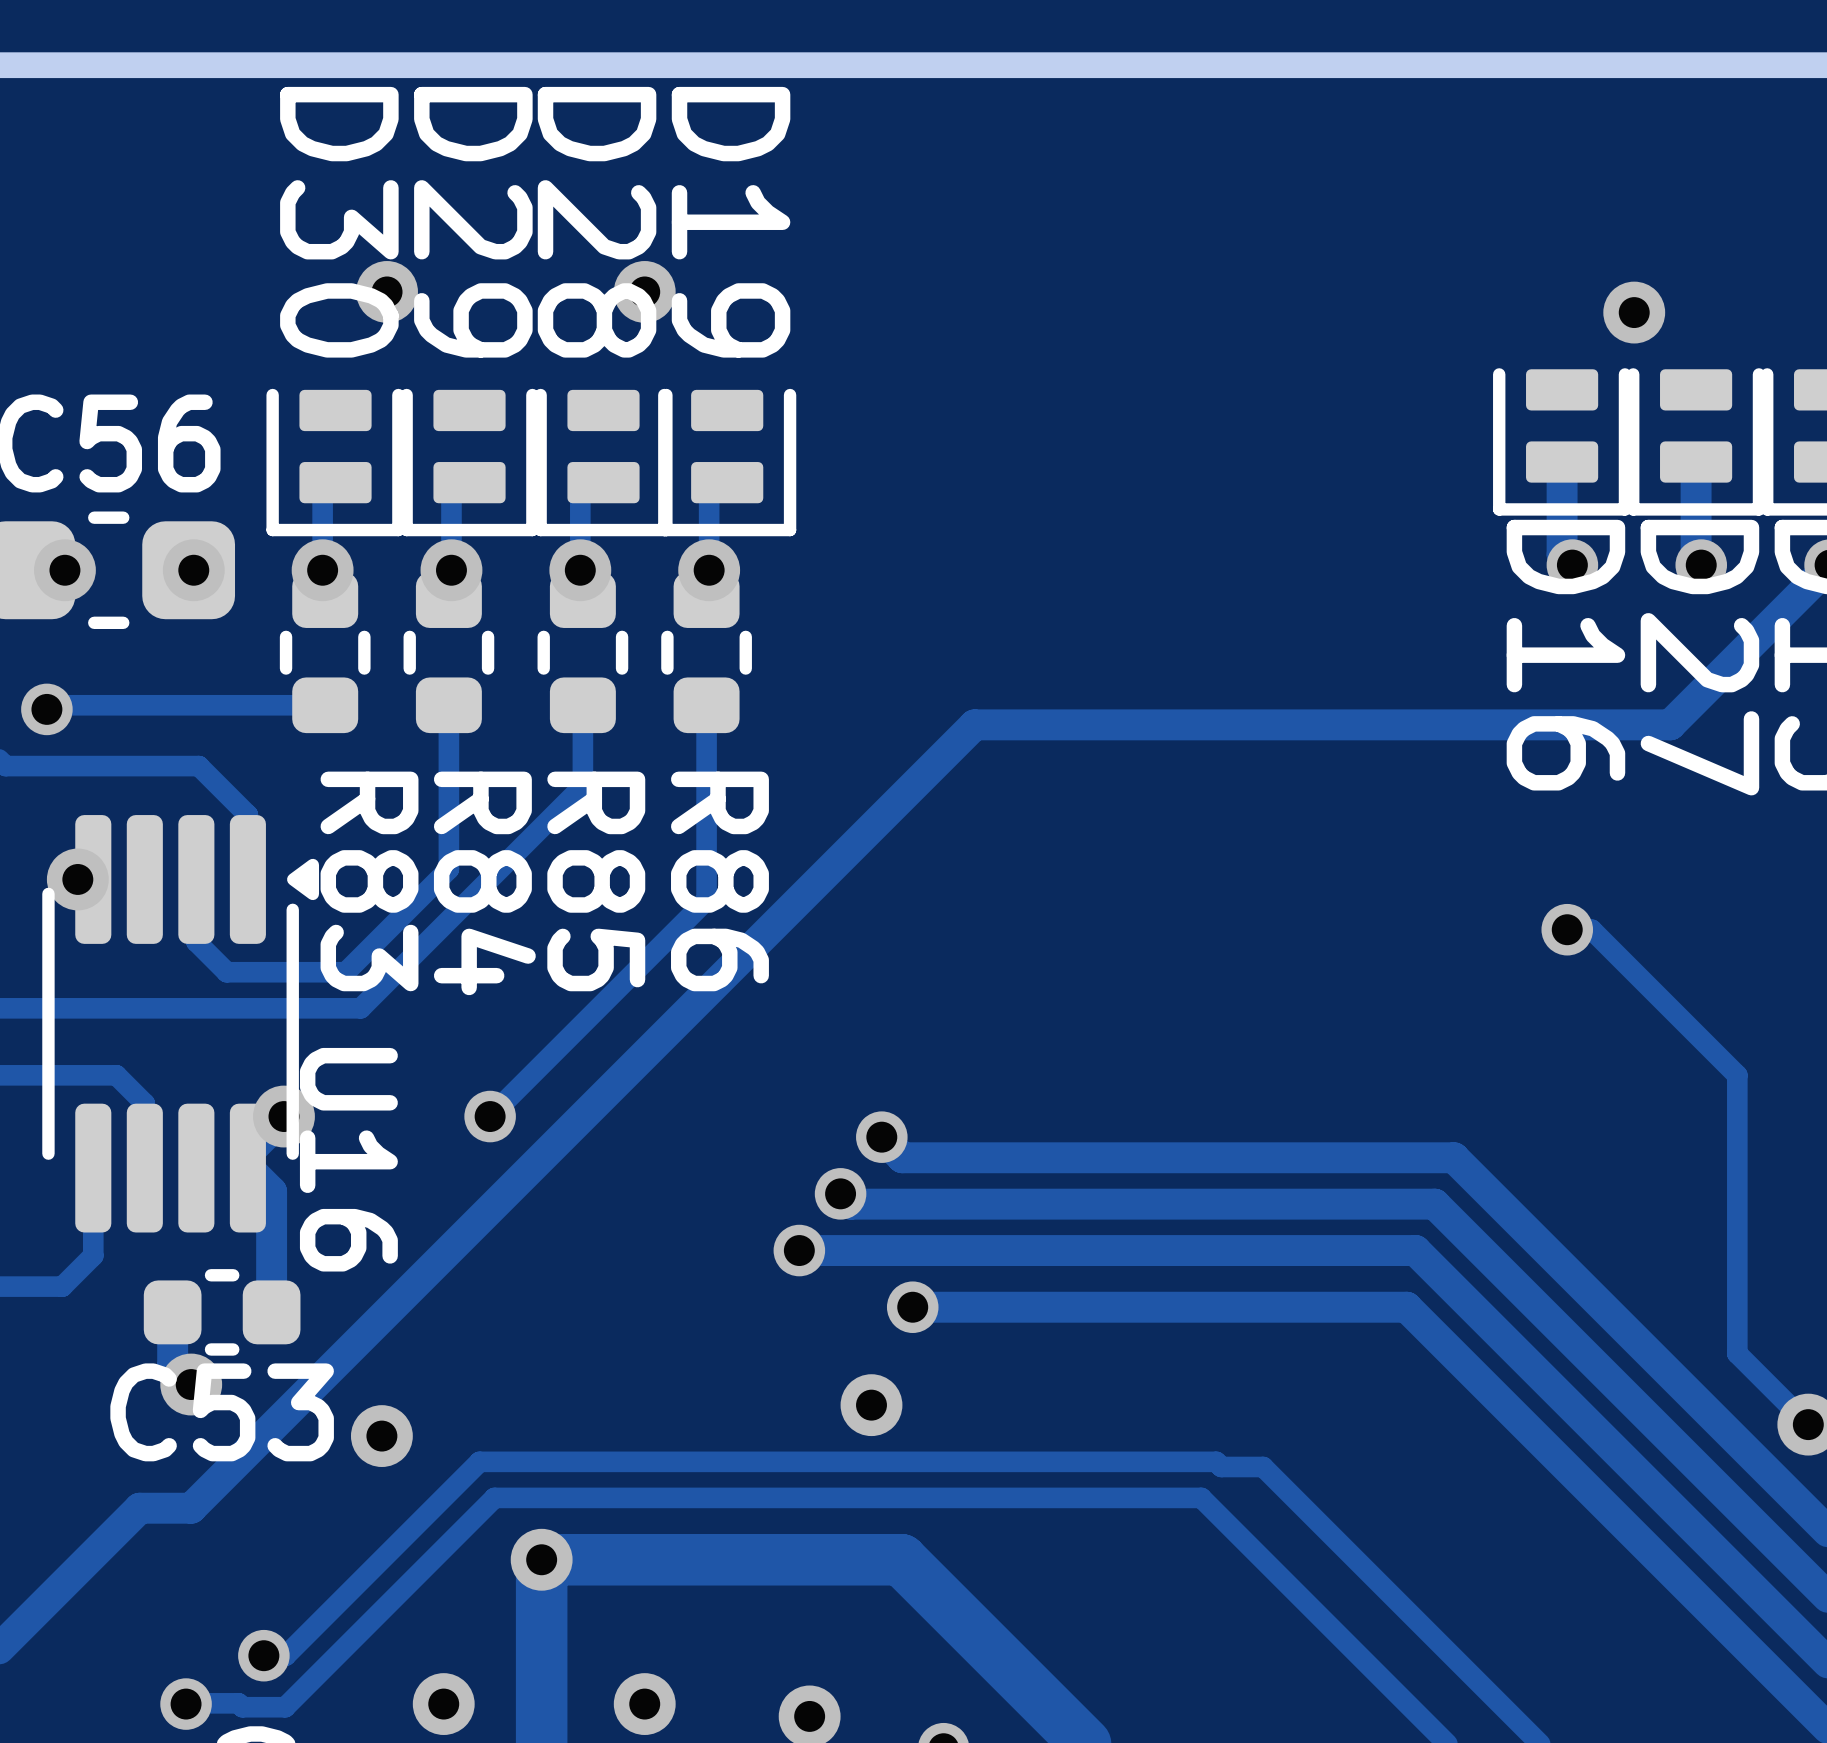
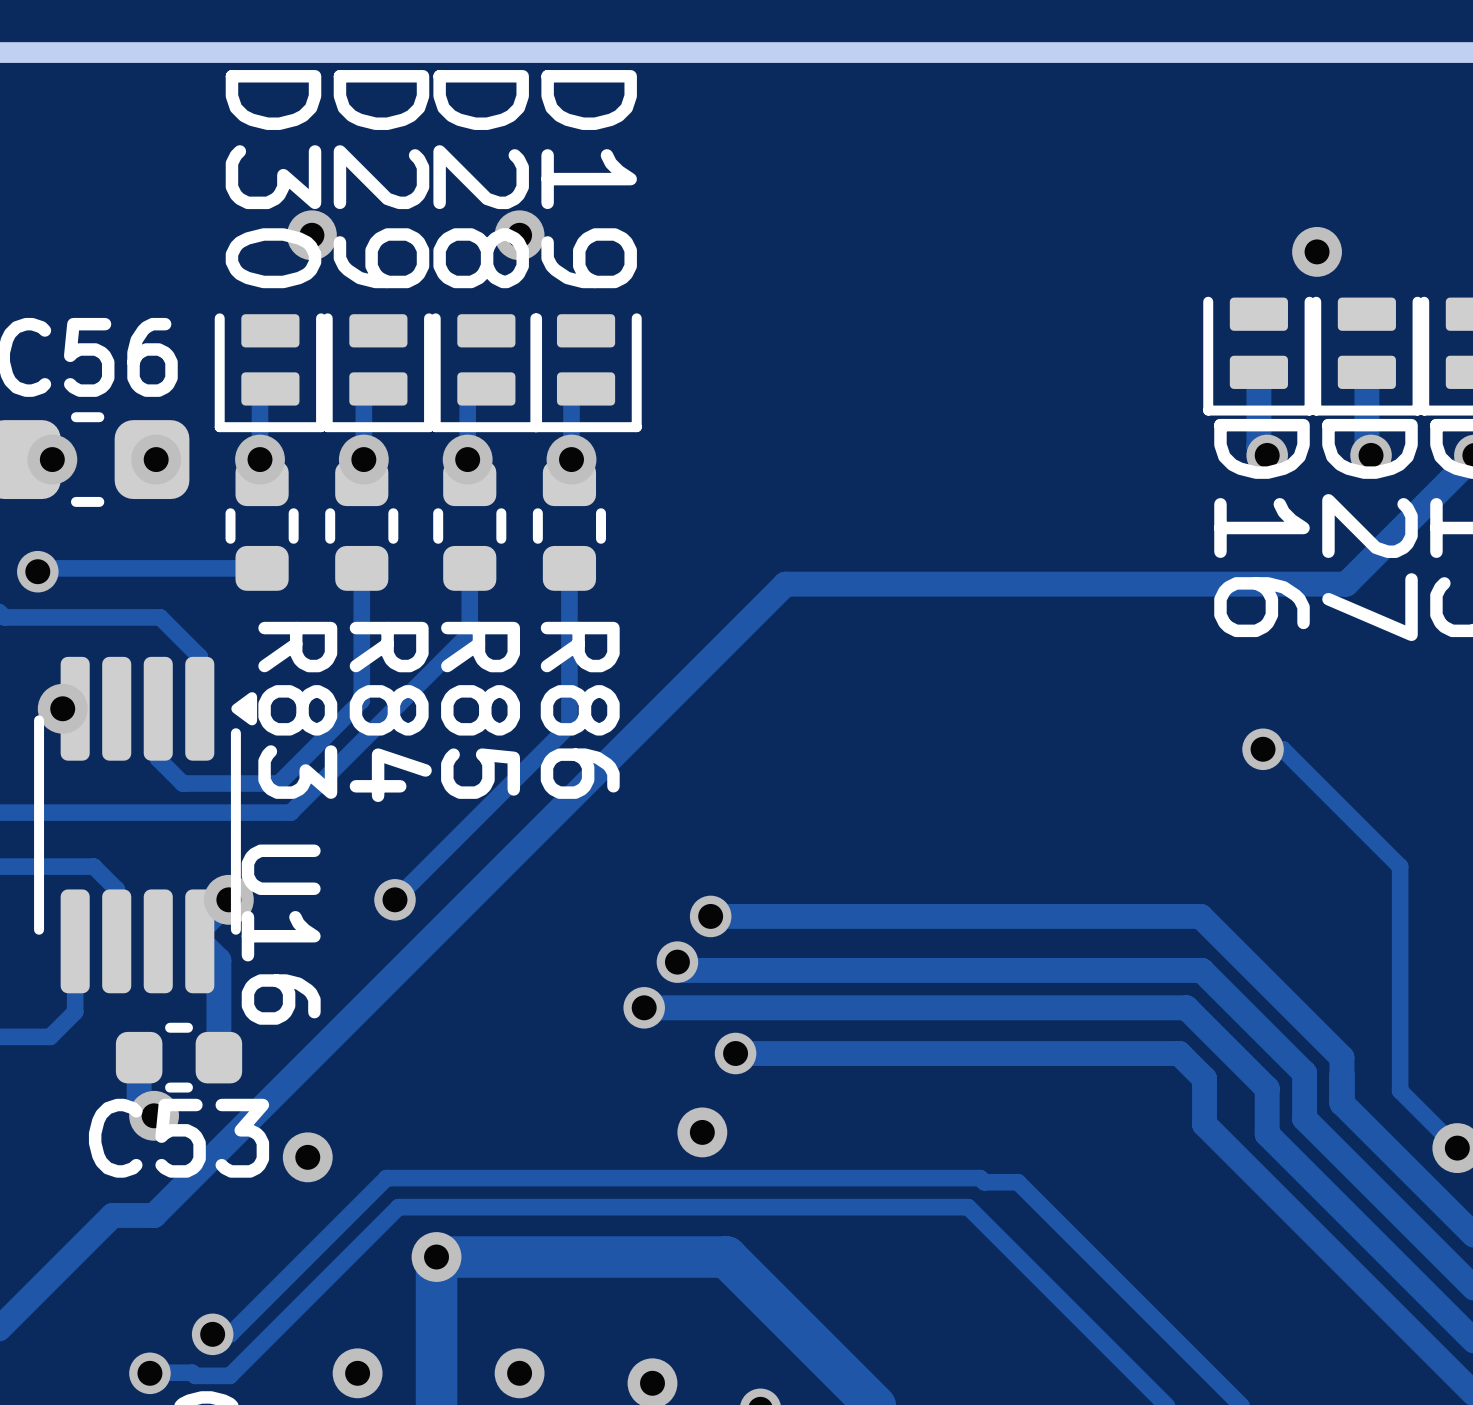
track: (881, 1137) (902, 1157) (1454, 1157) (1665, 1368) -> (710, 916) (1200, 916) (1341, 1057) (1341, 1103)
track: (1434, 1204) (1618, 1388) -> (1156, 970) (1201, 970) (1304, 1073) (1304, 1118)
track: (1415, 1250) (1572, 1407) -> (1140, 1007) (1186, 1007) (1267, 1088) (1267, 1134)
track: (1406, 1307) (1494, 1395) -> (1133, 1053) (1179, 1053) (1204, 1078) (1204, 1124)

